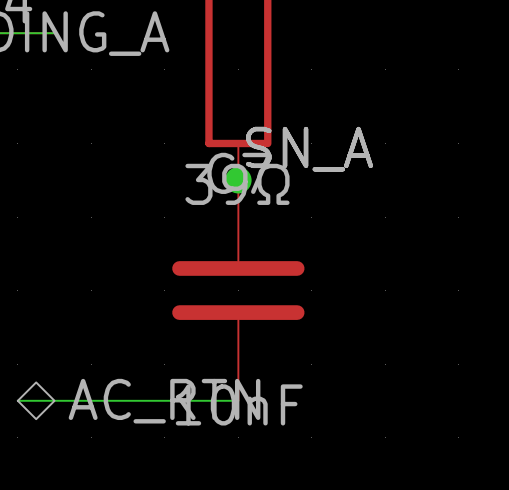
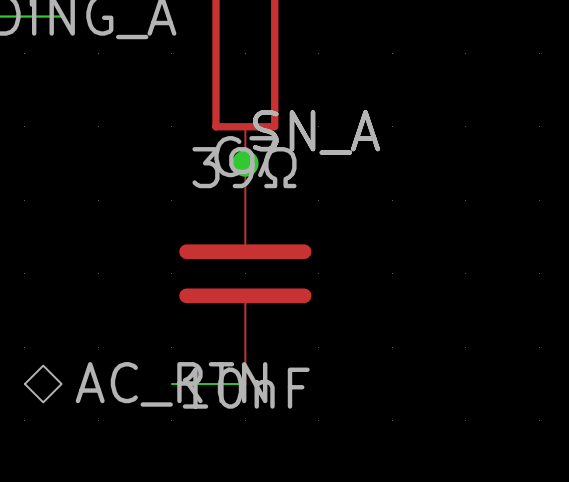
wire: (17, 400) (164, 400) -> none

